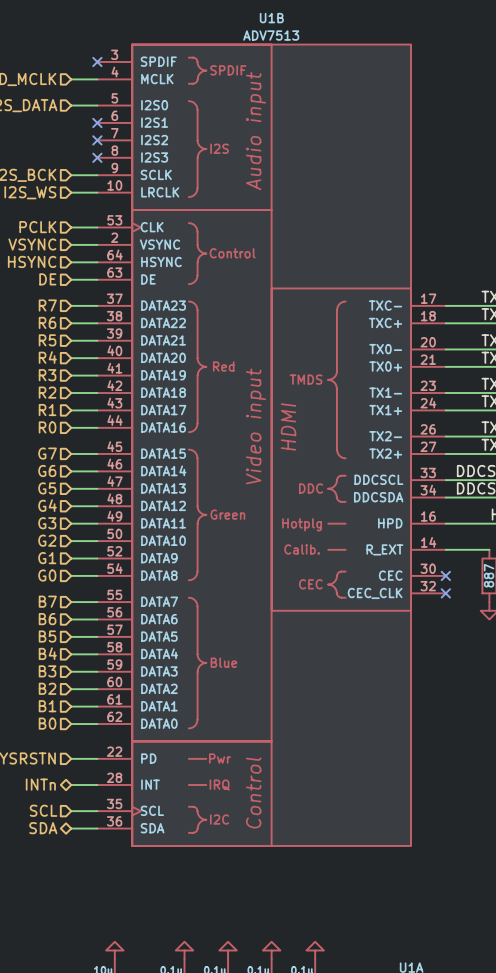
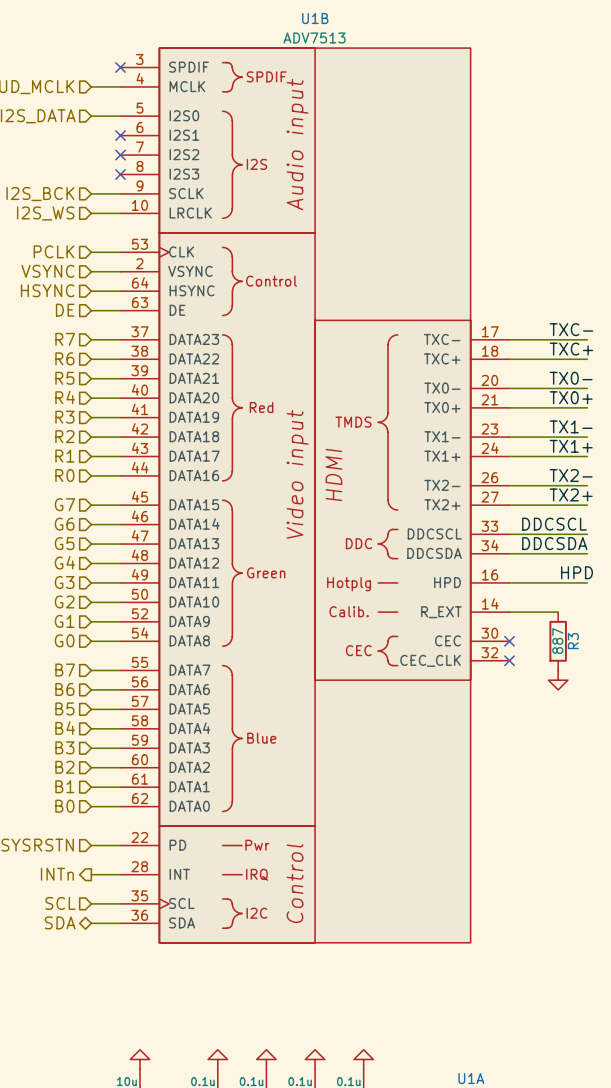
hierarchical label shape: bidirectional (40, 784) -> output (57, 874)

